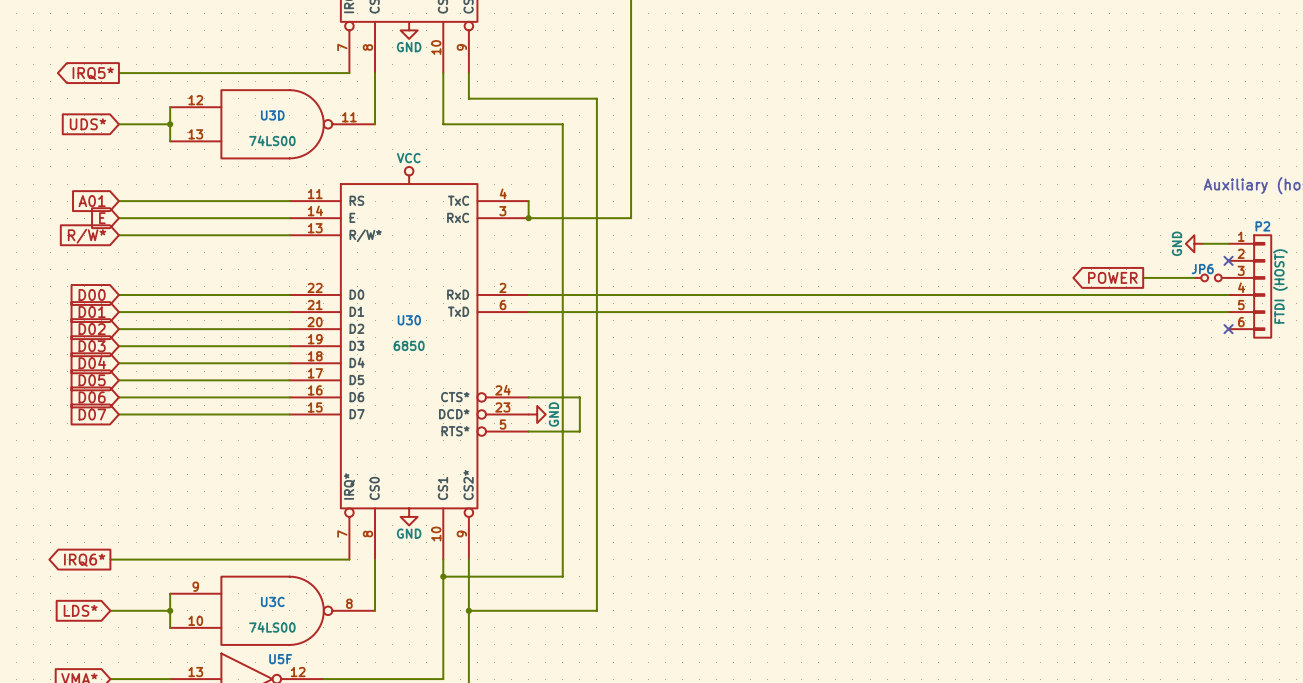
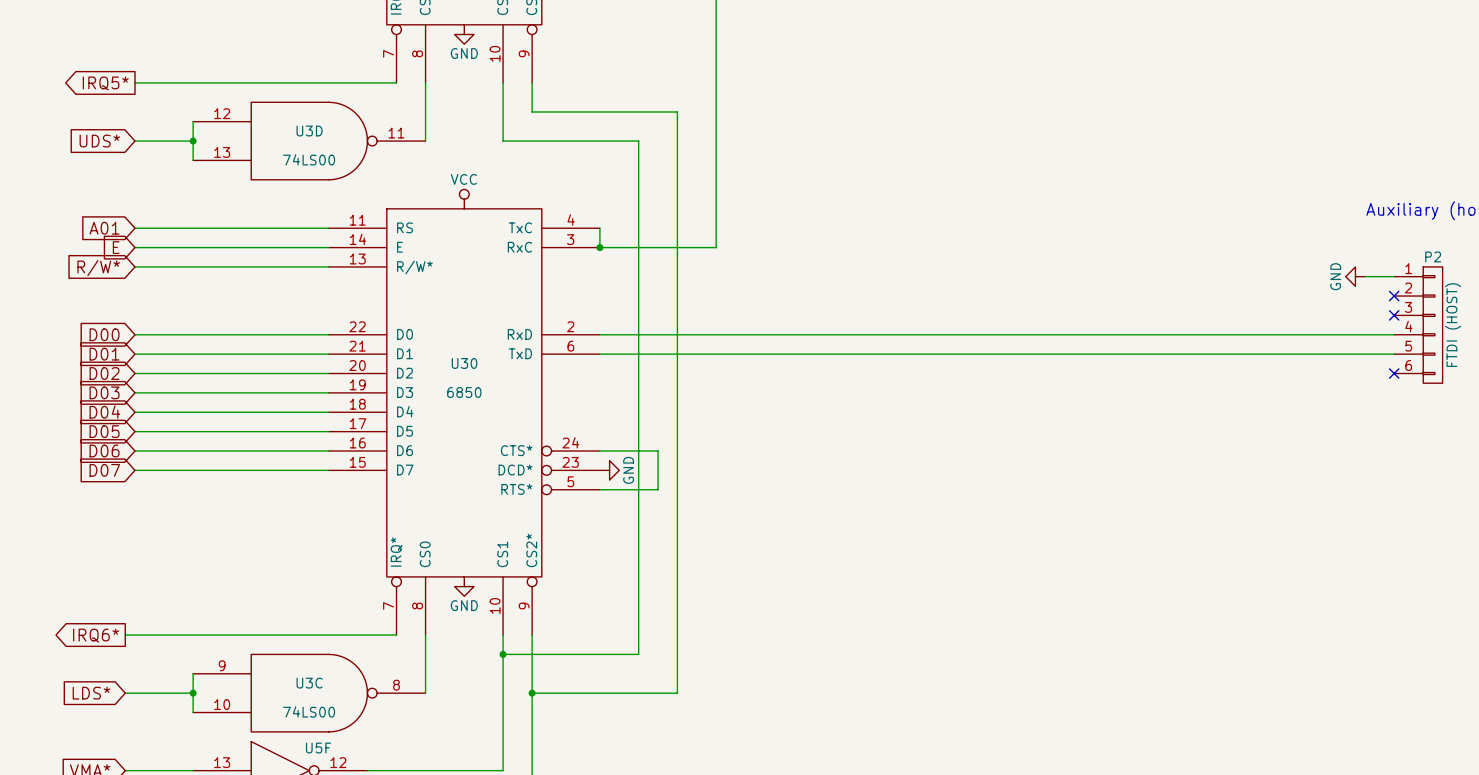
global label: POWER (1112, 277) -> none
wire: (1143, 277) (1194, 277) -> none
JP6: (1211, 277) -> none
no-connect mark: none -> (1394, 315)

